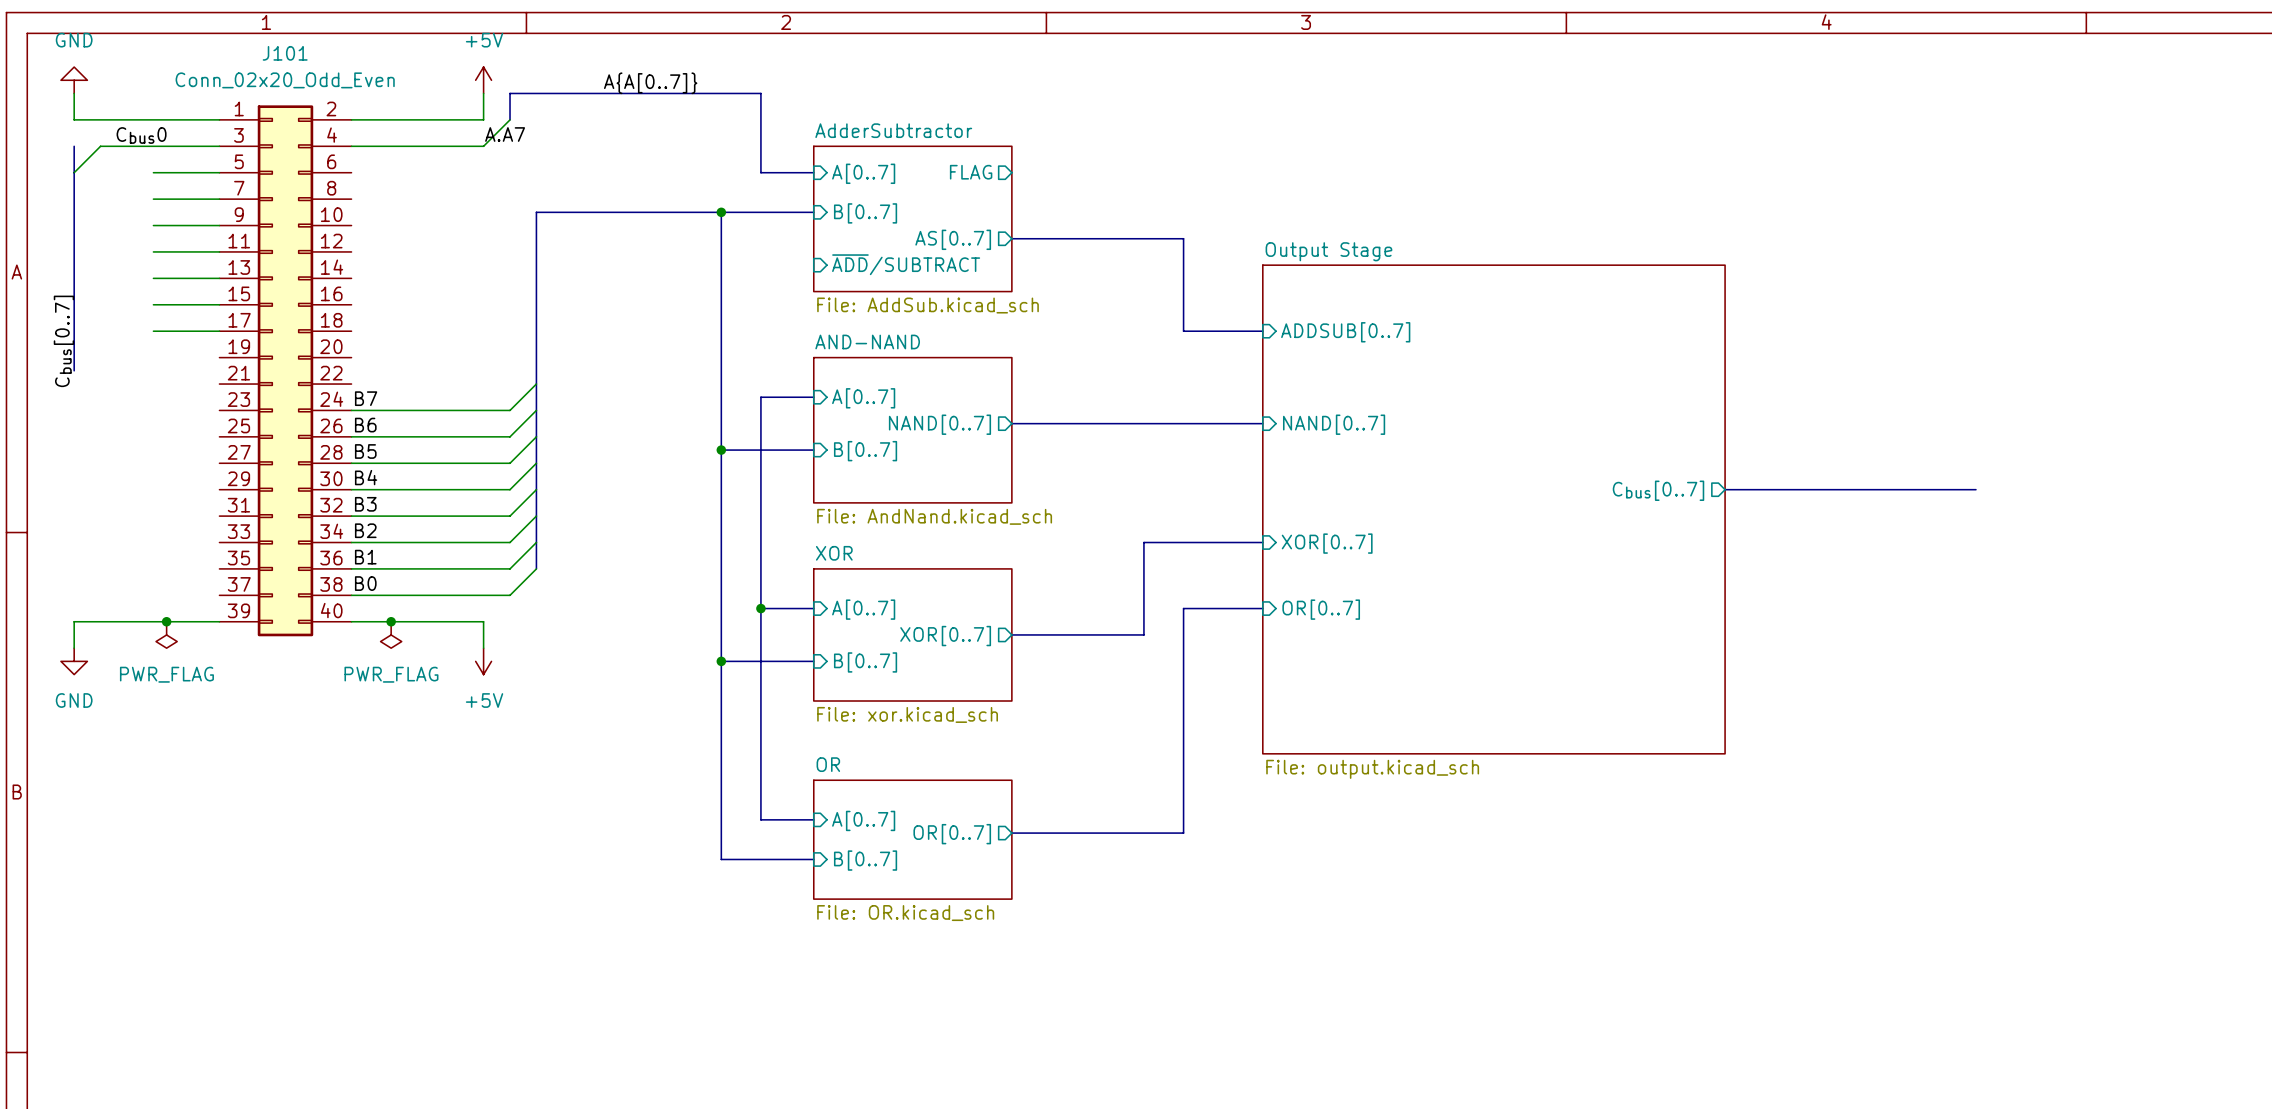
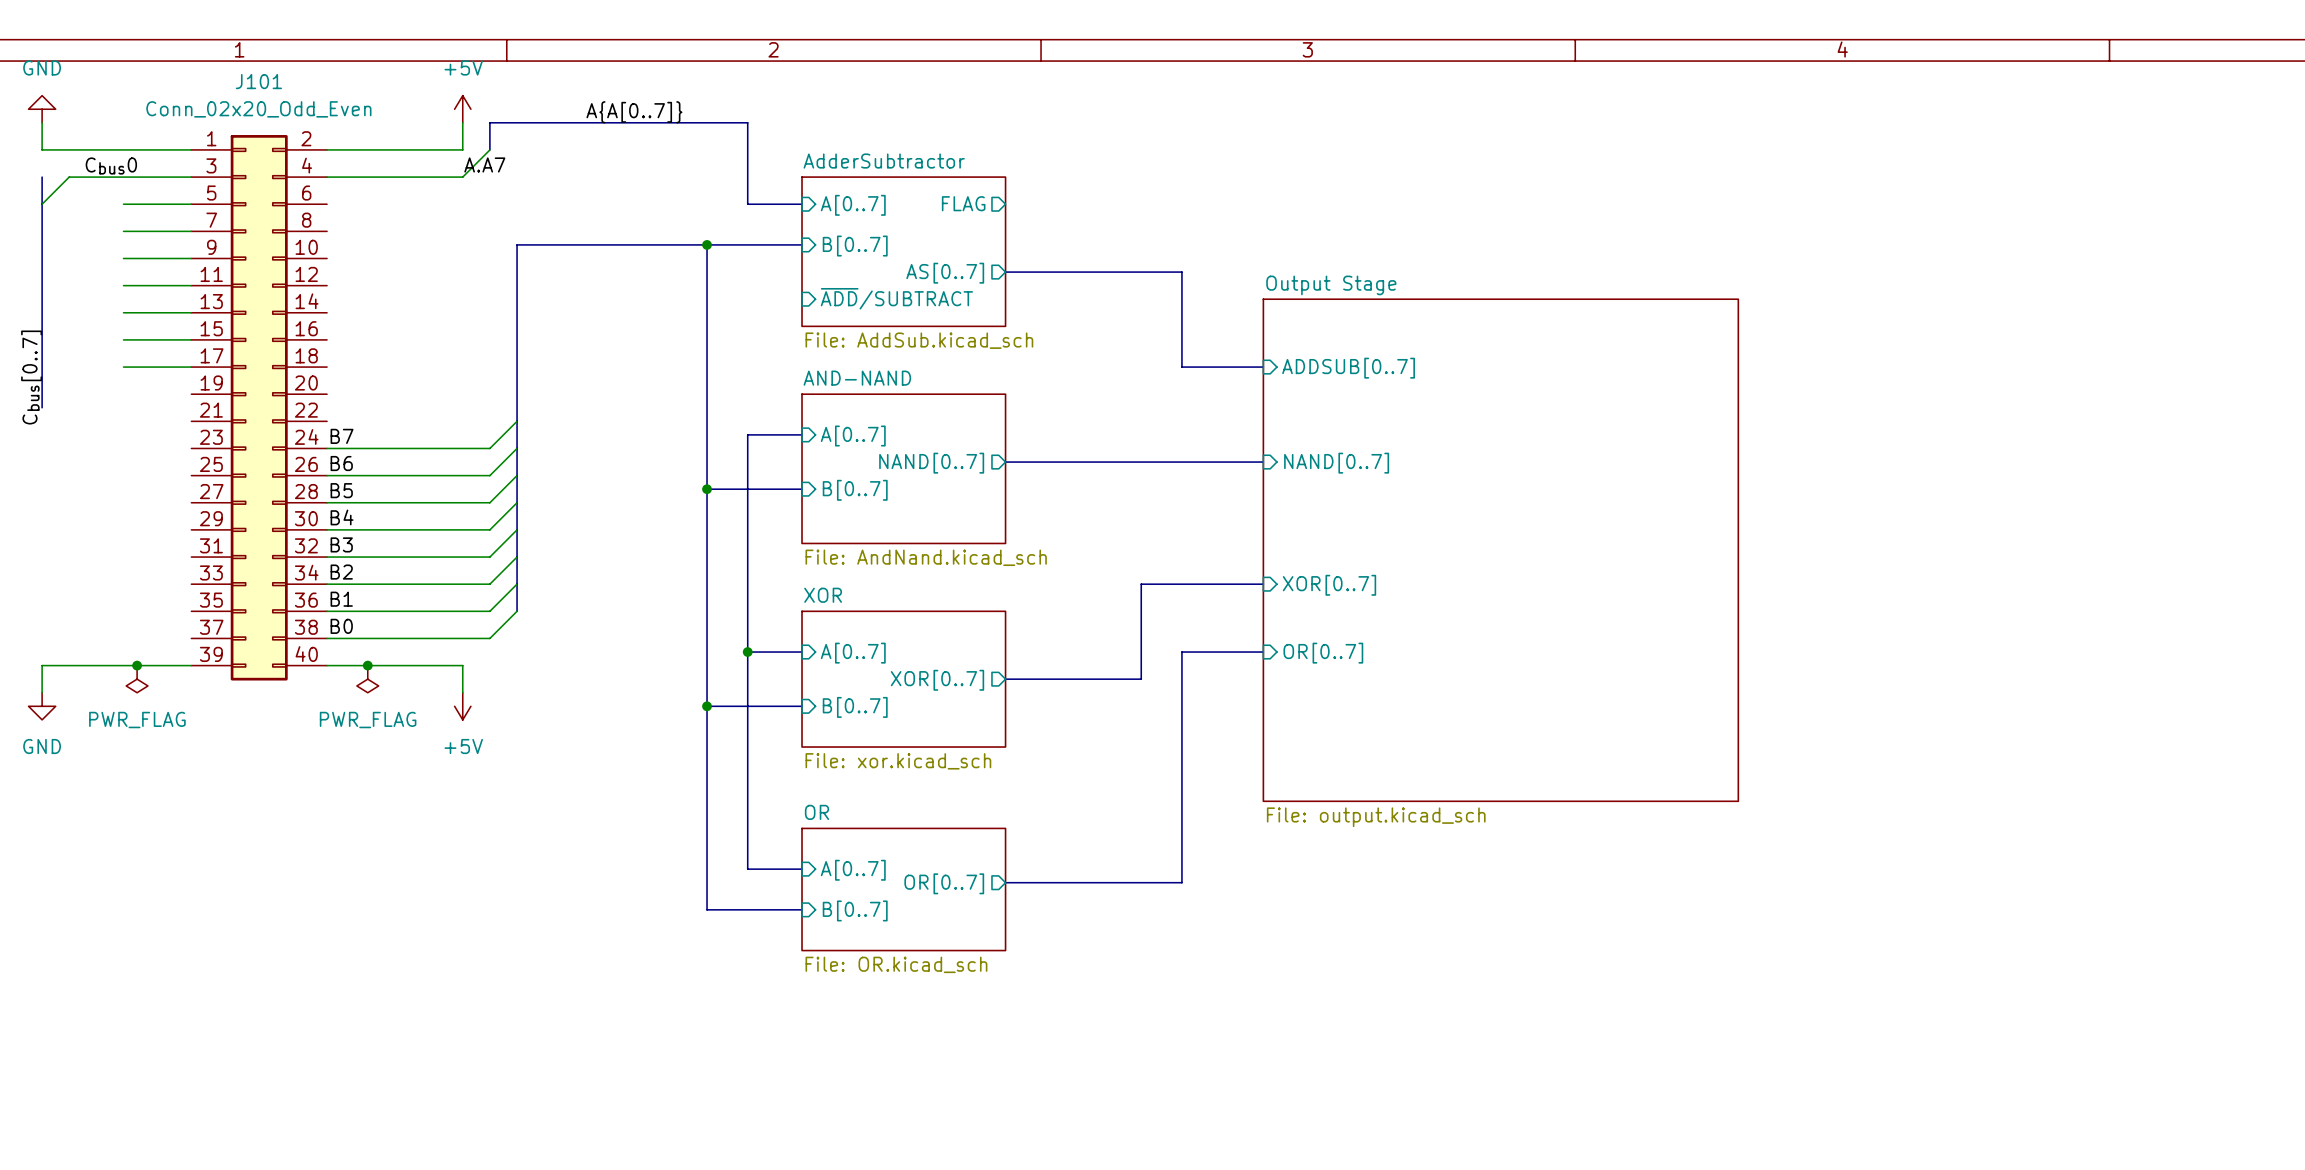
bus: (1725, 489) (1976, 489) -> none
sheet pin: Cbus[0..7] (1658, 490) -> none

